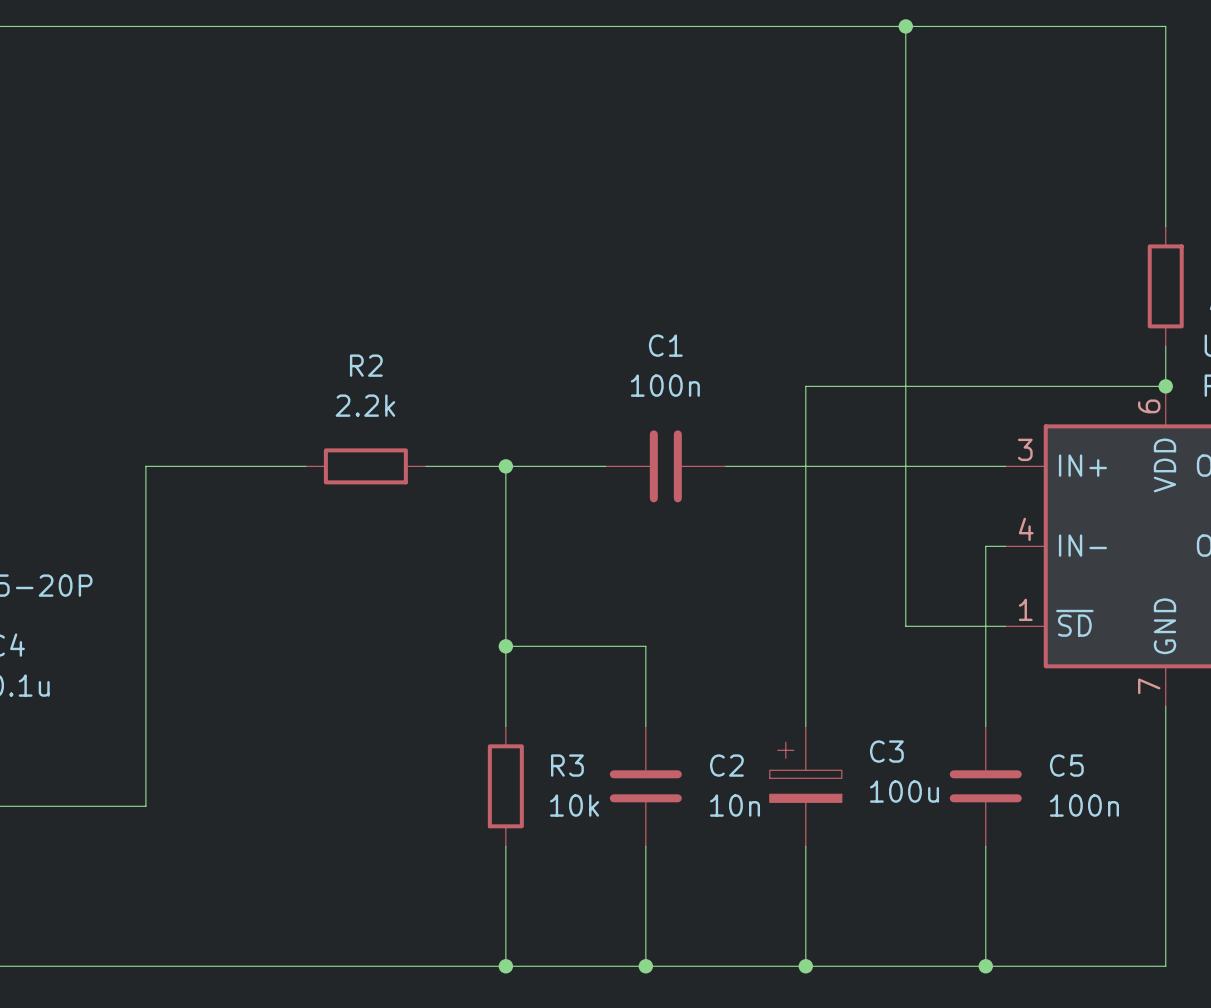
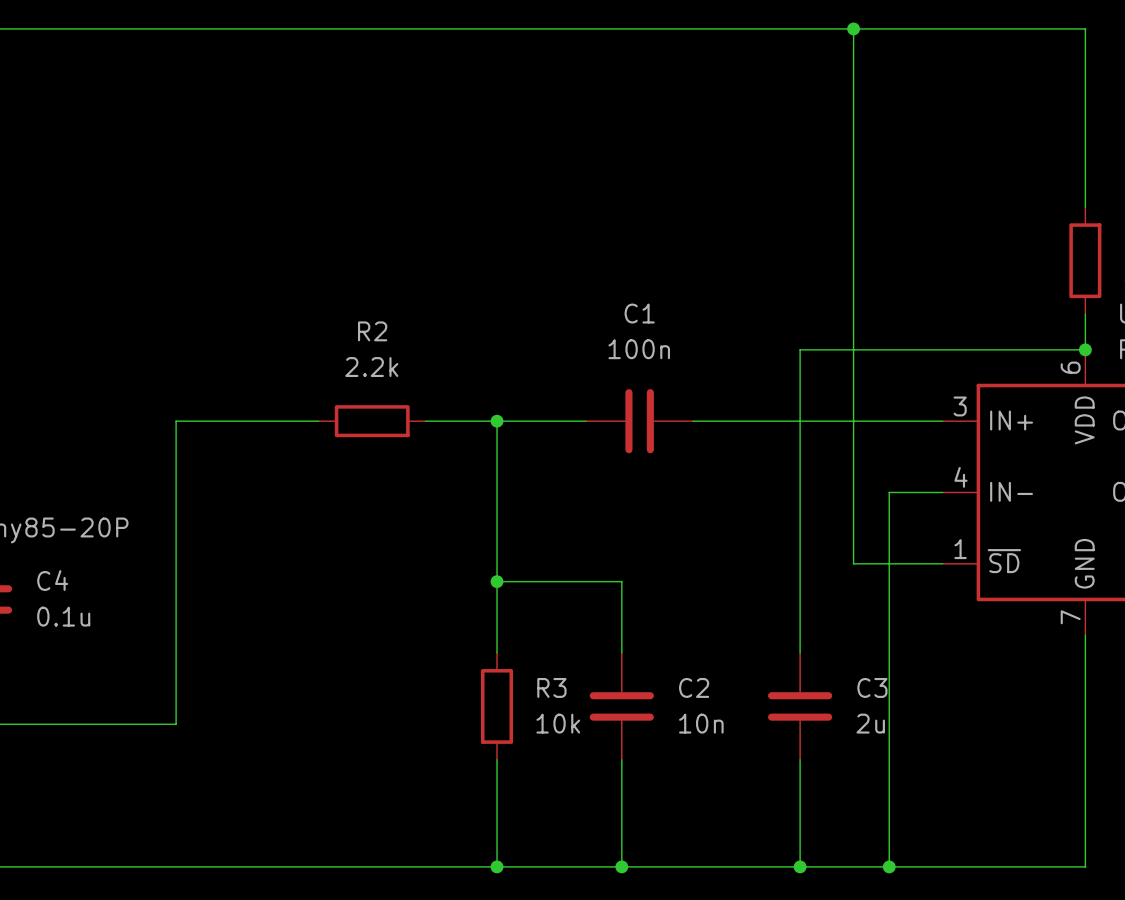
wire: (845, 386) (805, 386) (805, 726) -> (800, 349) (800, 652)
wire: (985, 546) (985, 726) -> (924, 492) (889, 492) (889, 866)
C3 symbol: [769, 726, 842, 847] -> [768, 652, 833, 760]
C5: 100n (985, 786) -> none
C3 value: 100u (904, 791) -> 2u (870, 723)
wire: (805, 846) (805, 966) -> (800, 759) (800, 866)
wire: (985, 846) (985, 966) -> none
junction position: (805, 966) -> (800, 866)
junction position: (985, 966) -> (889, 866)

